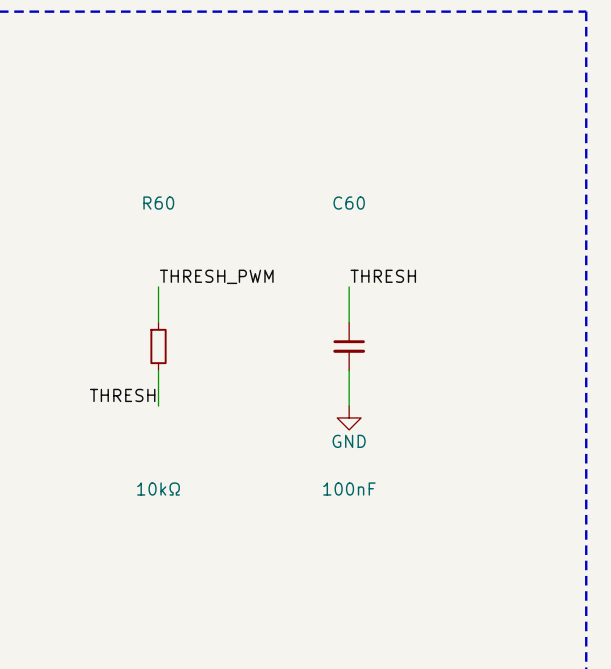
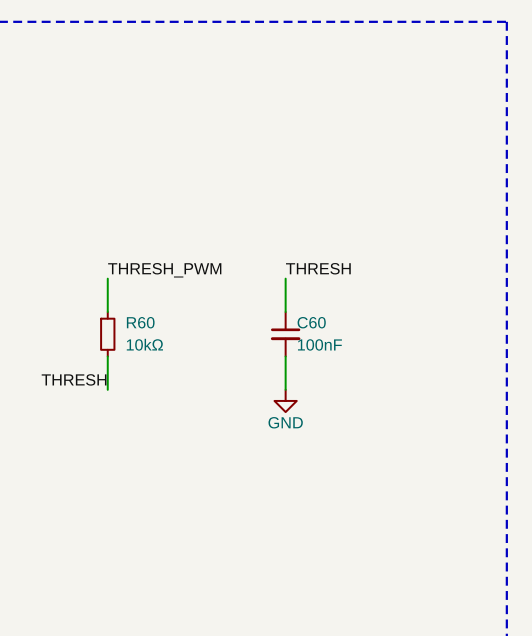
R60 name position: R60 (158, 203) -> R60 (140, 322)
C60 name position: C60 (349, 203) -> C60 (311, 322)
R60 value position: 10kΩ (158, 489) -> 10kΩ (144, 344)
C60 value position: 100nF (349, 489) -> 100nF (319, 344)

